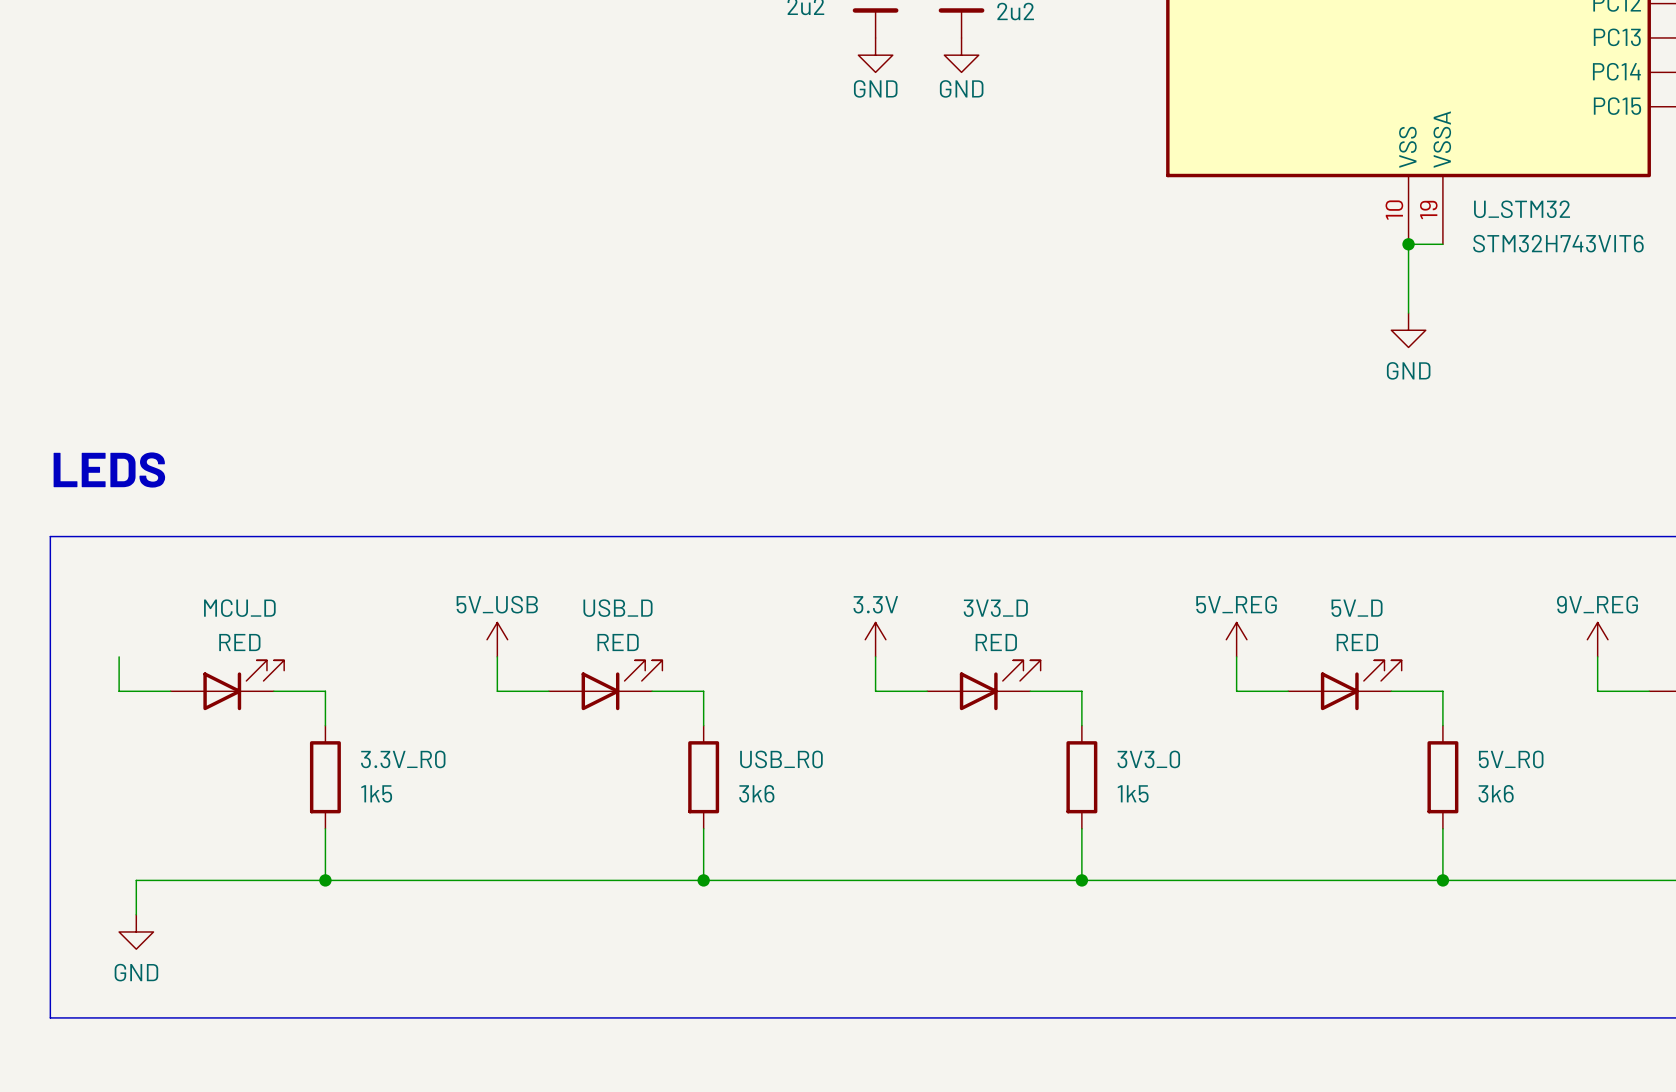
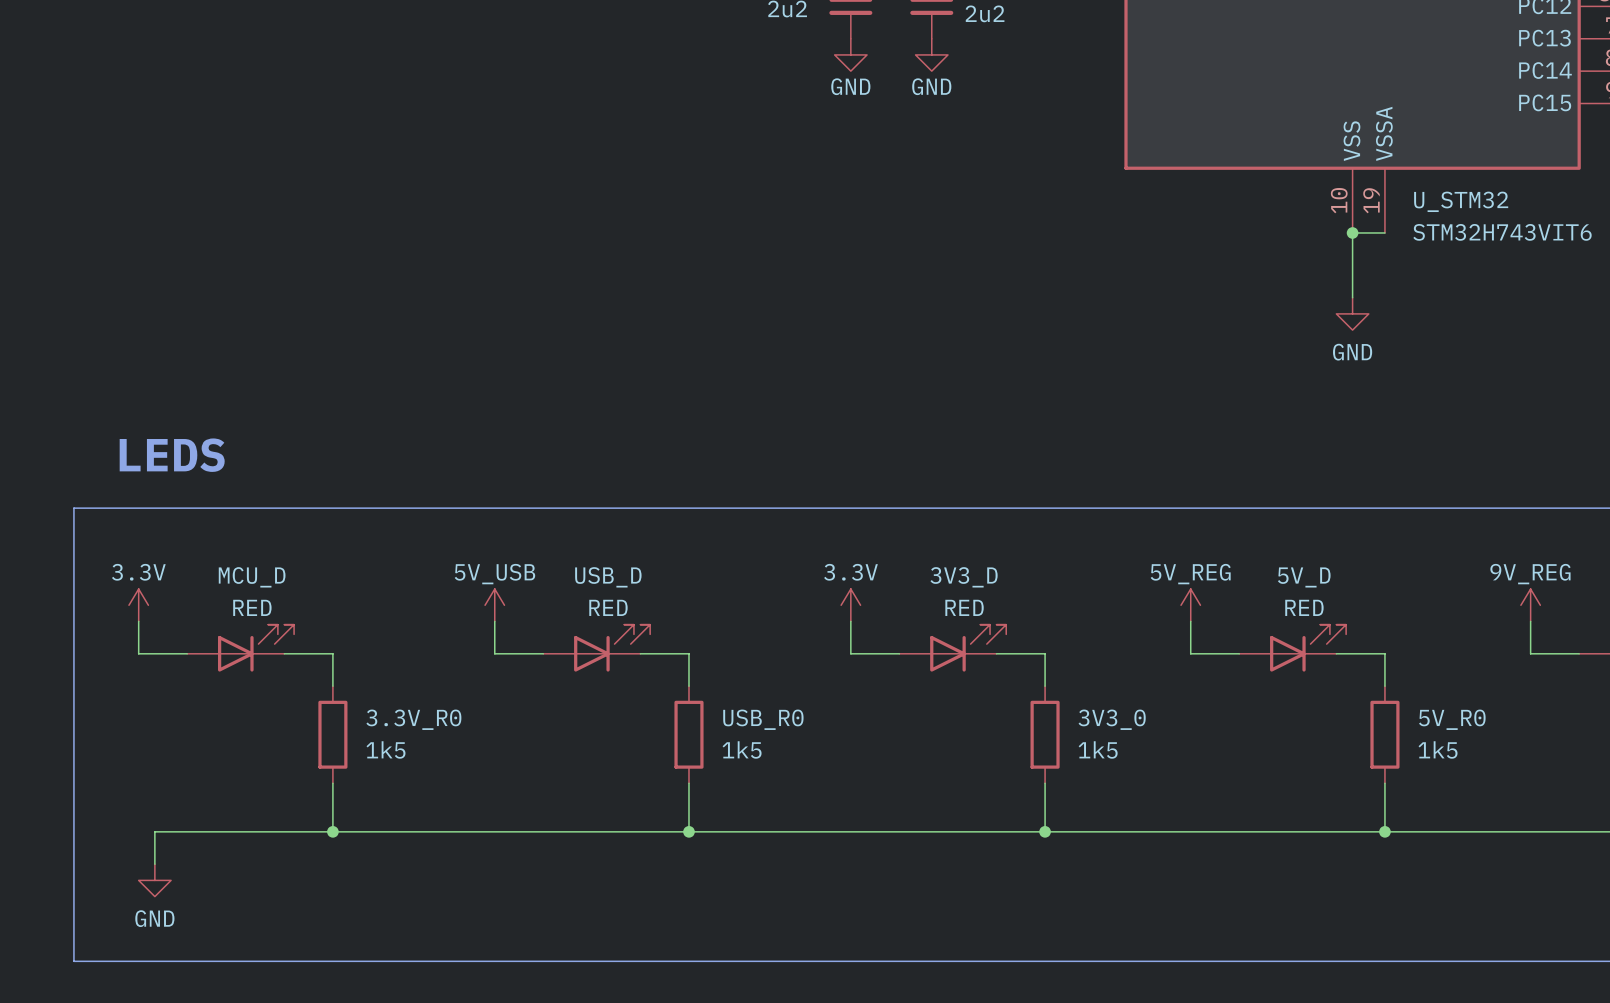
text position: LEDS (109, 470) -> LEDS (172, 455)
power symbol: none -> 3.3V (138, 605)
USB_R0 value: 3k6 (756, 793) -> 1k5 (742, 749)
5V_R0 value: 3k6 (1496, 793) -> 1k5 (1438, 749)

